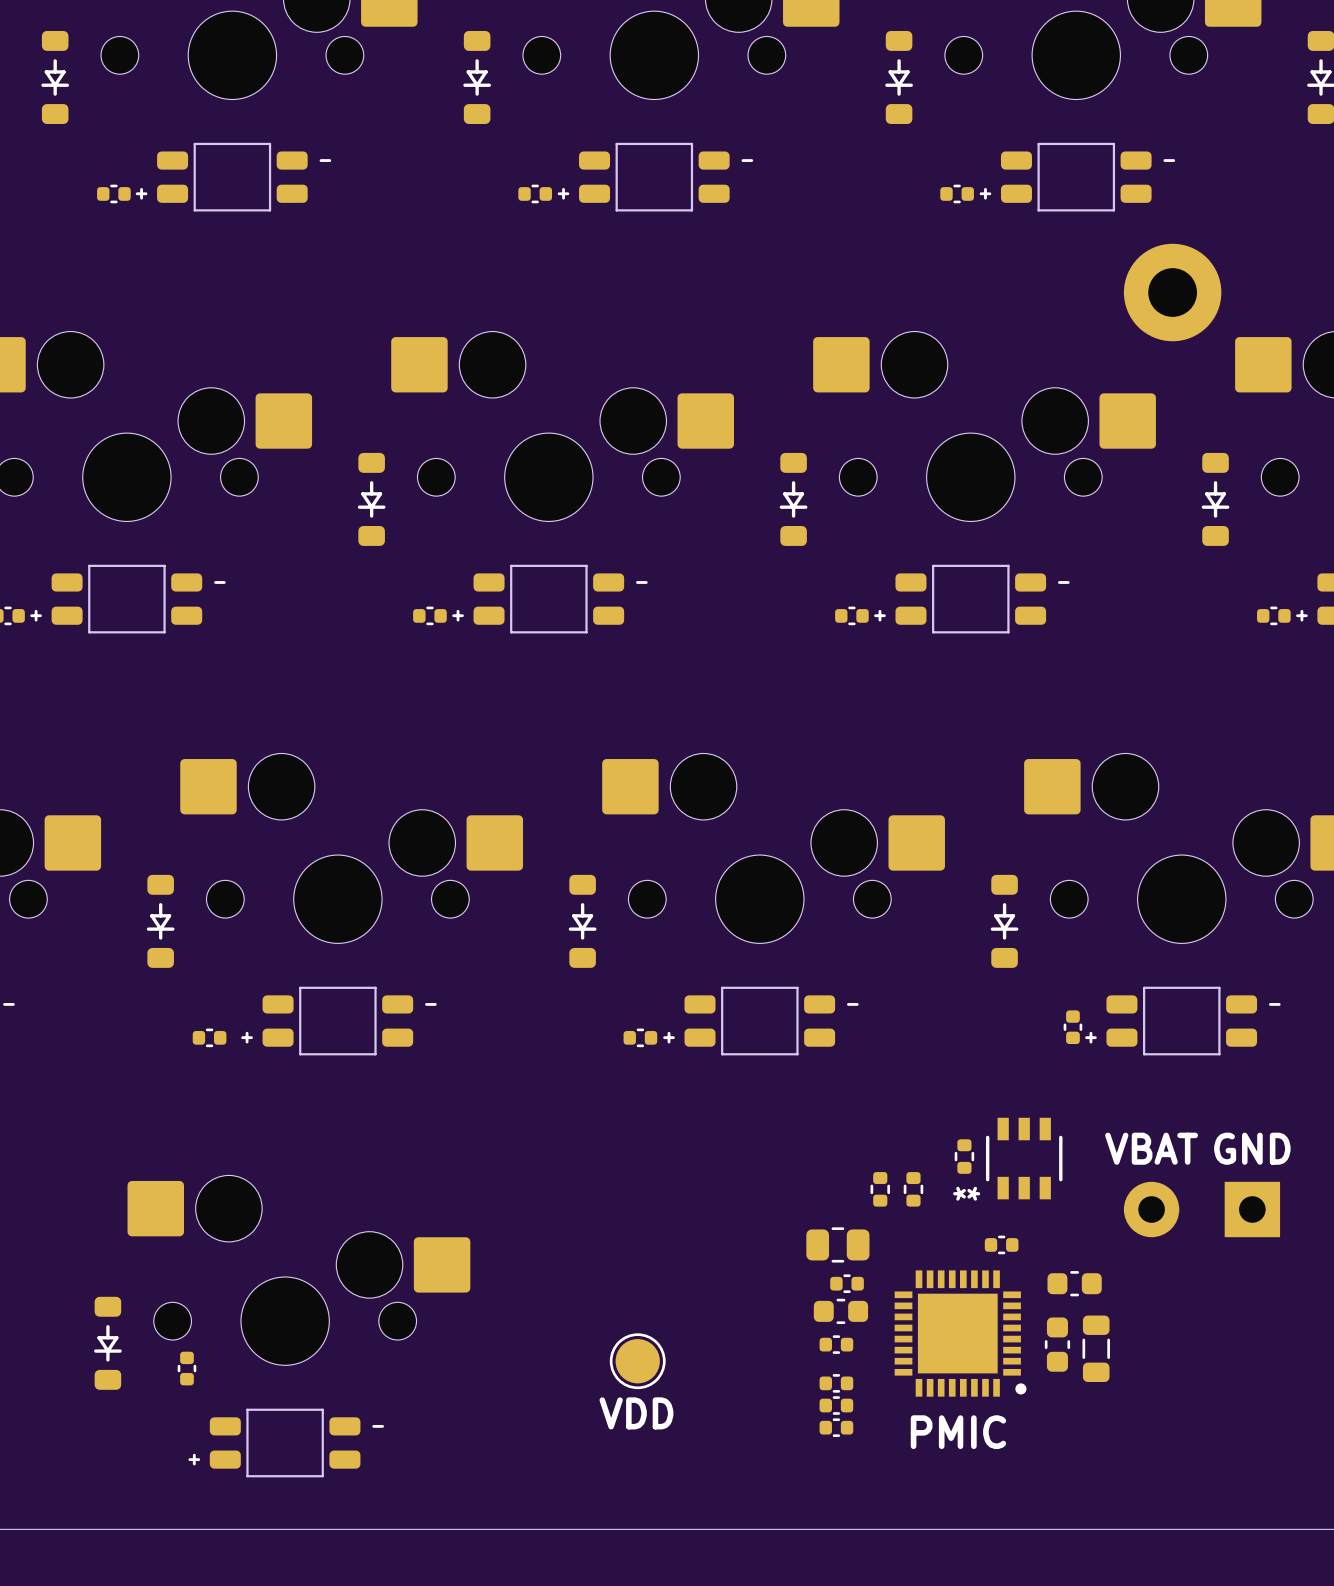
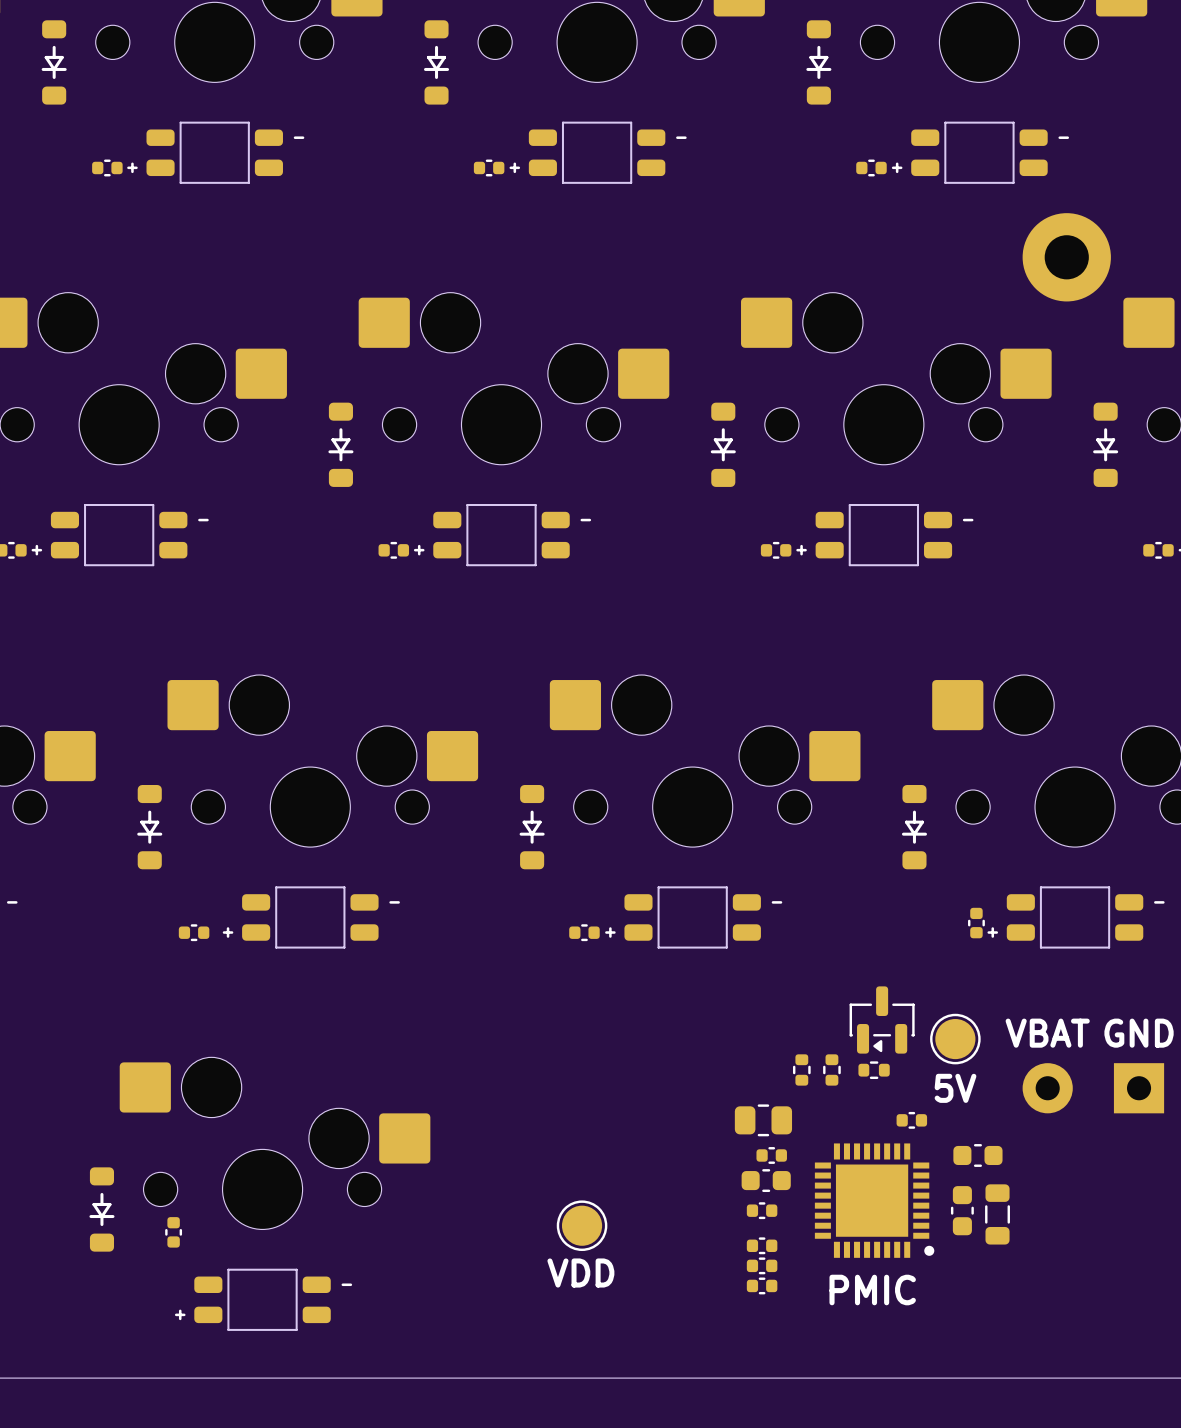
part: none -> (882, 1020)
5V: none -> (955, 1039)
part rotation: 0° (964, 1156) -> 90° clockwise (874, 1070)
part position: (964, 1156) -> (874, 1070)
part: (1024, 1158) -> none

